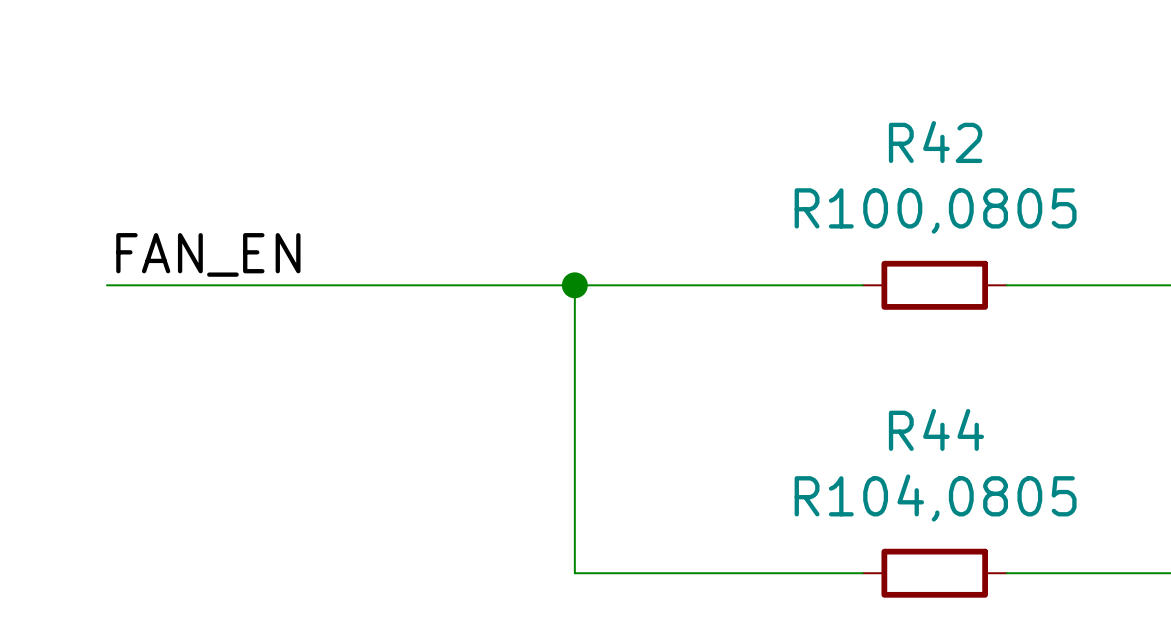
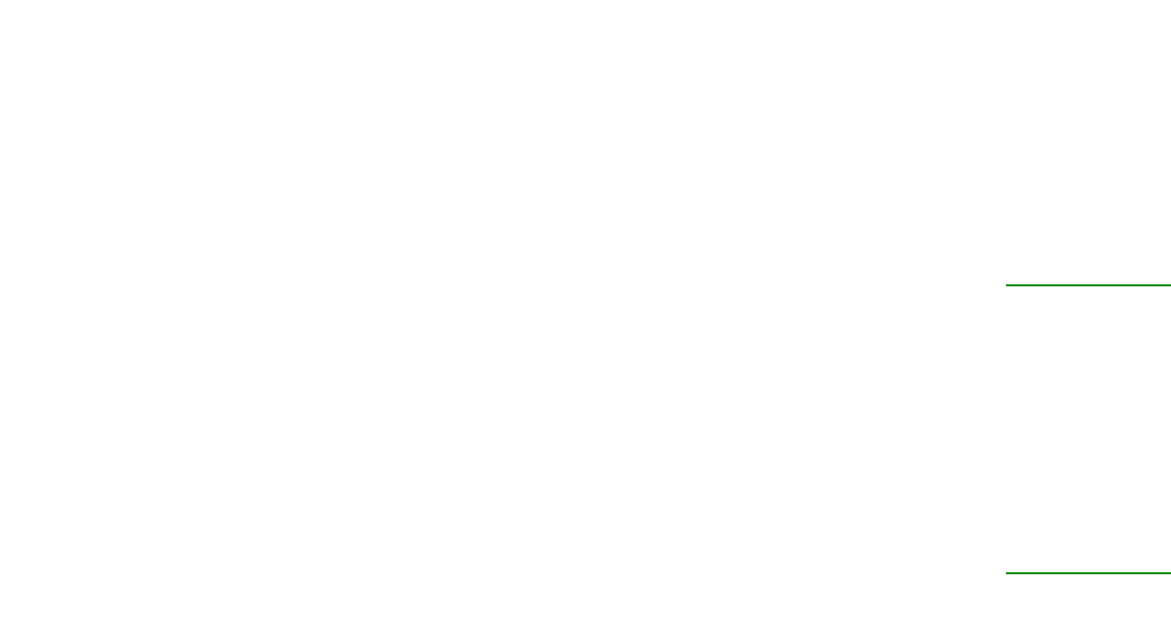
label: FAN_EN (208, 254) -> none
wire: (106, 285) (862, 285) -> none
wire: (574, 285) (574, 573) (862, 573) -> none
junction: (574, 285) -> none
R42: R100,0805 (934, 285) -> none
R44: R104,0805 (934, 573) -> none

